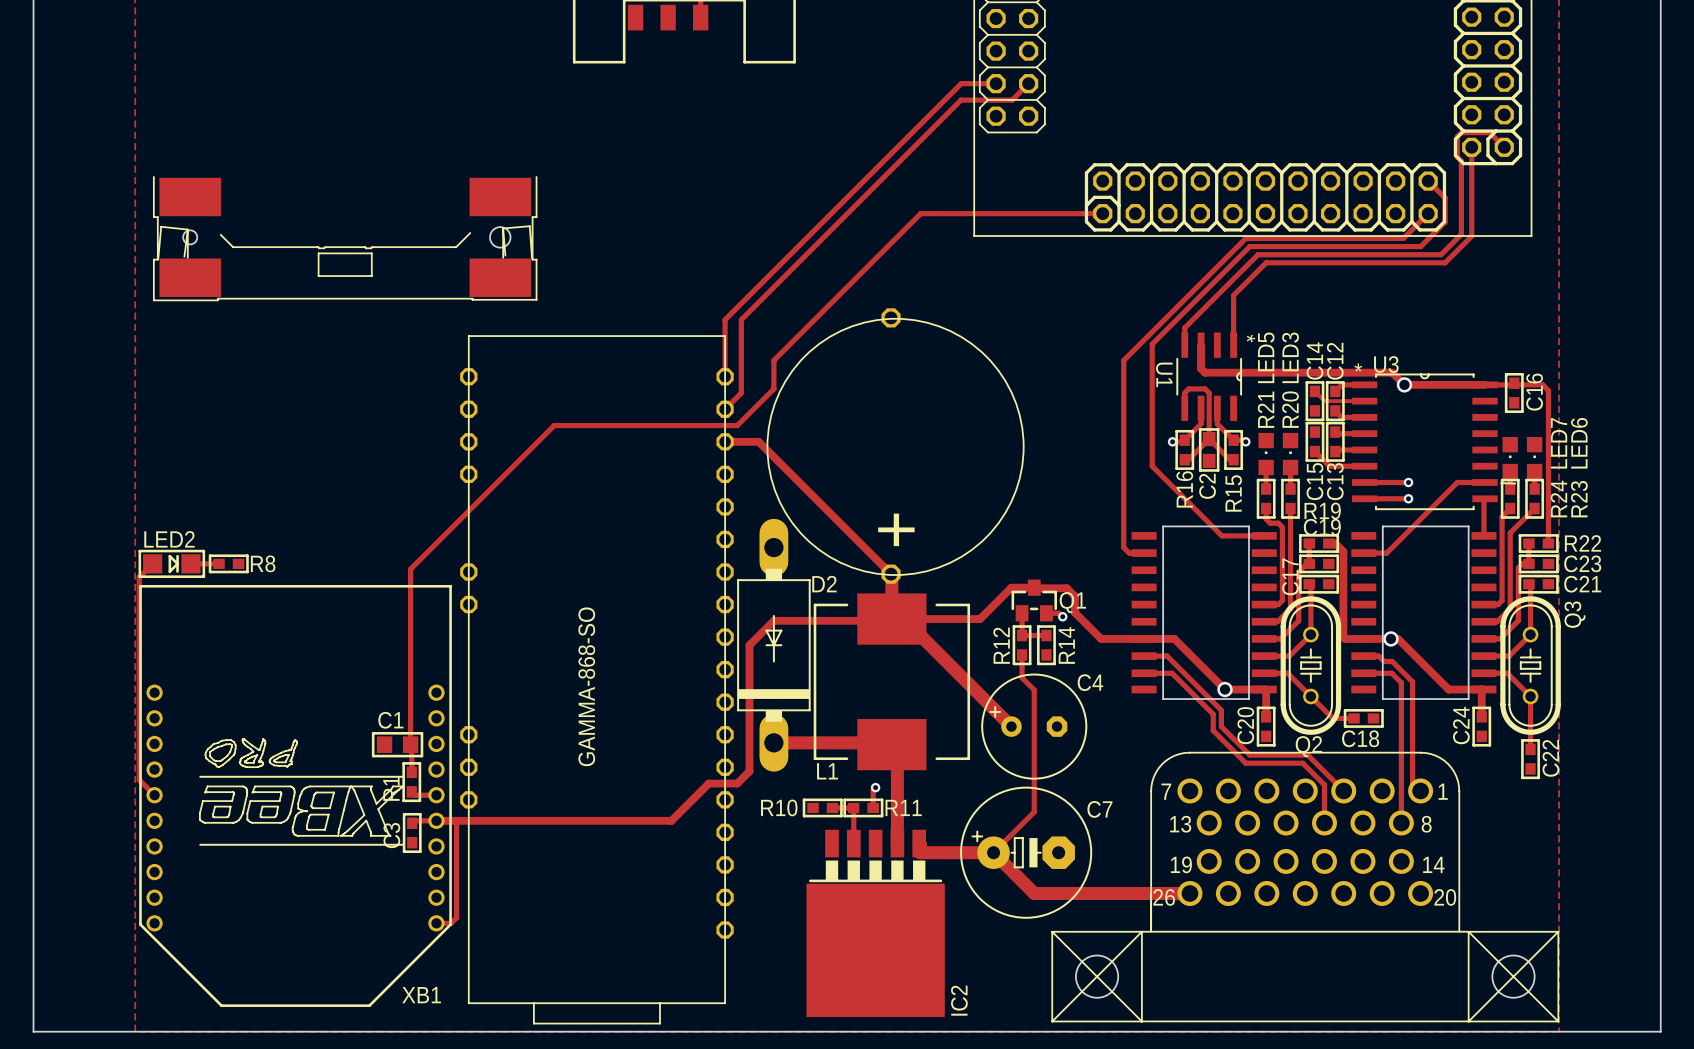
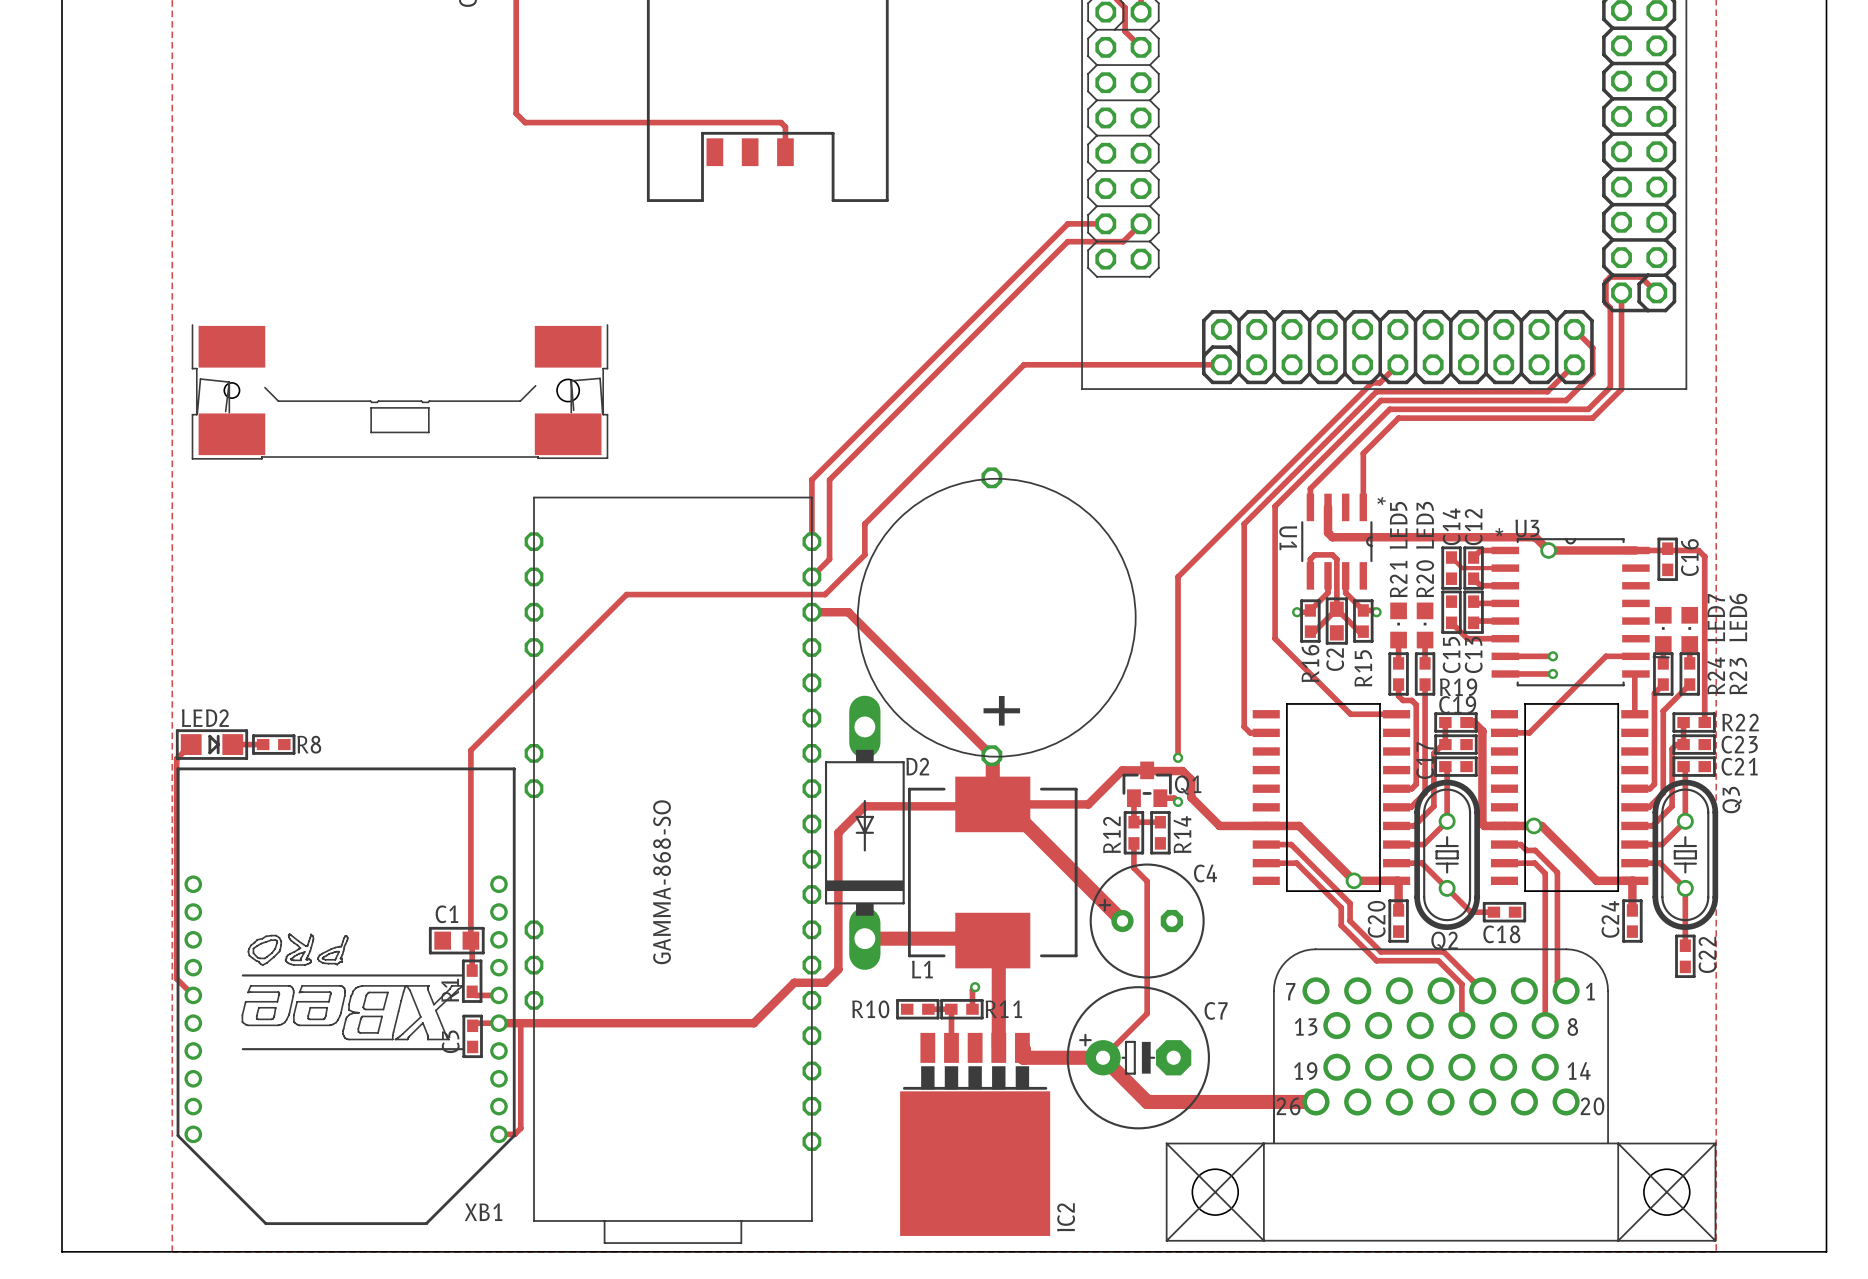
track: none -> (1397, 364) (1379, 382) (1372, 382) (1178, 576) (1178, 757)
via: none -> (1178, 757)

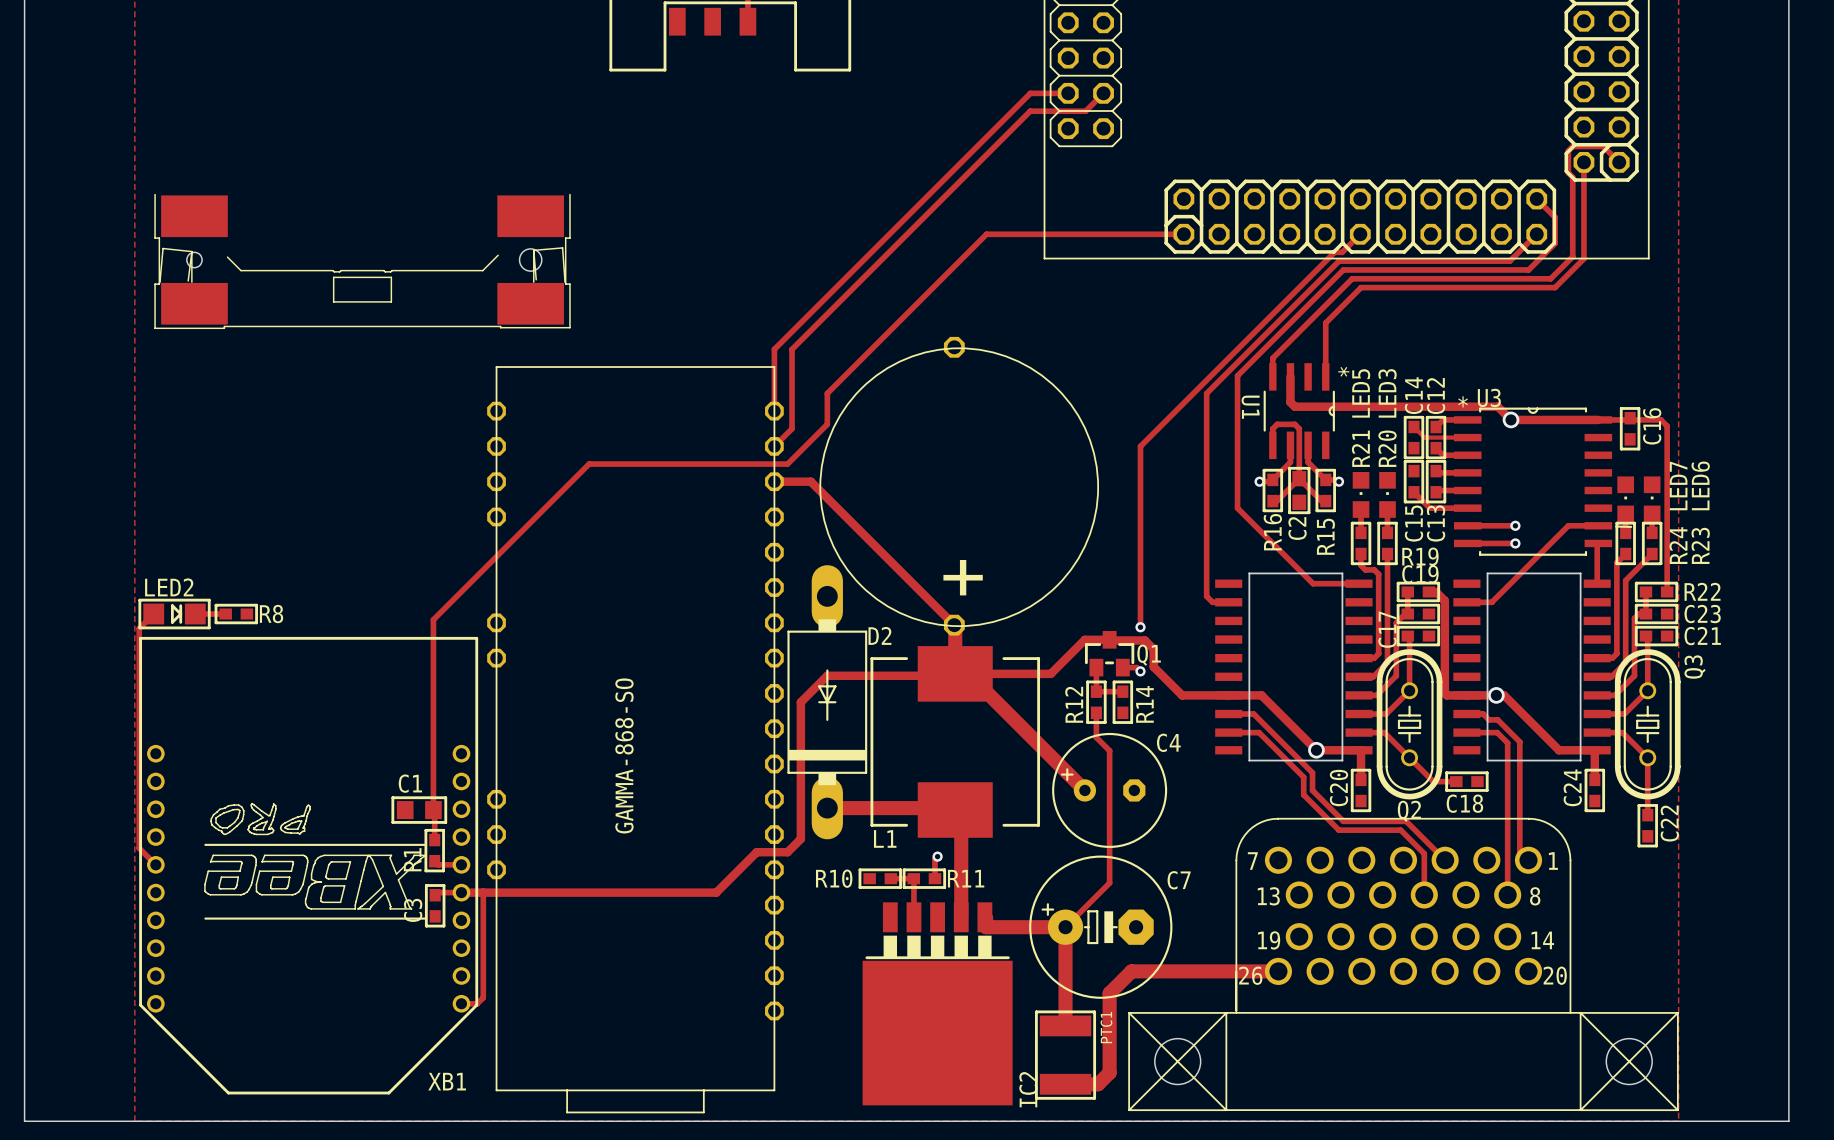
track: (1103, 1057) (1147, 1101) (1169, 1101) -> (1065, 927) (1065, 1025)
track: none -> (1131, 971) (1109, 993) (1109, 1072) (1098, 1084) (1065, 1084)
PTC1: none -> (1065, 1055)

